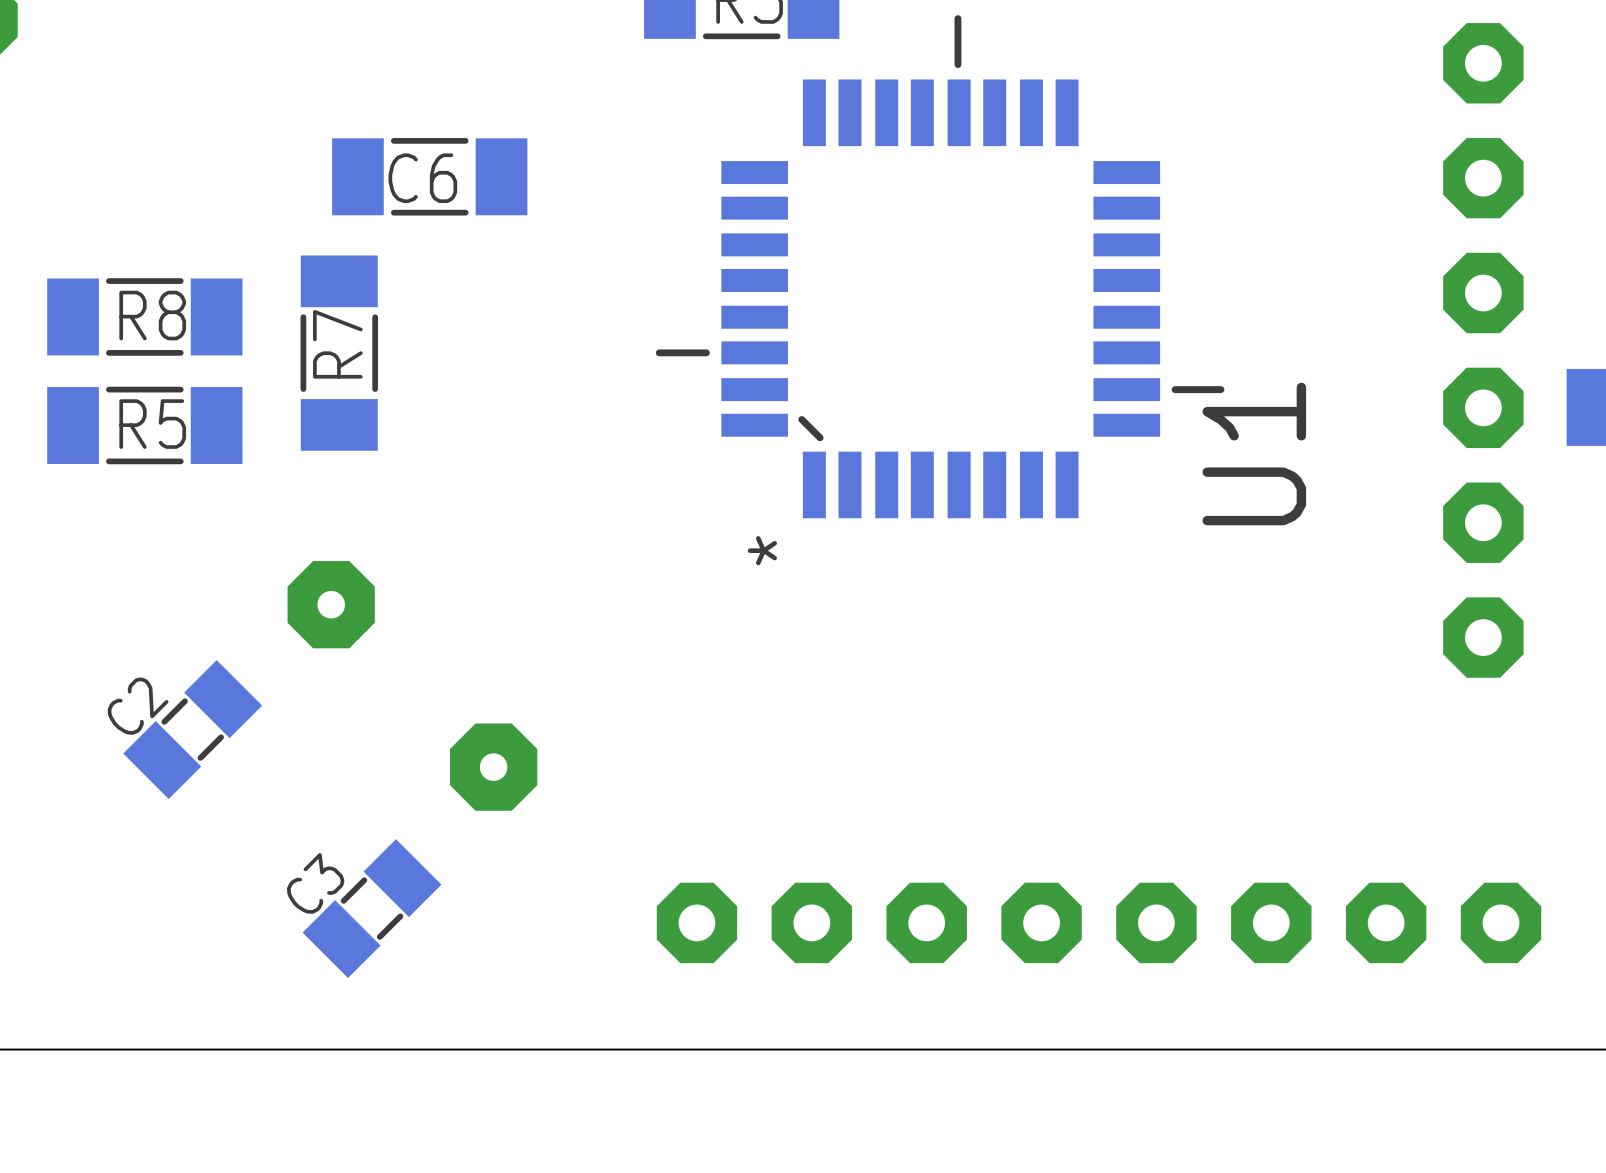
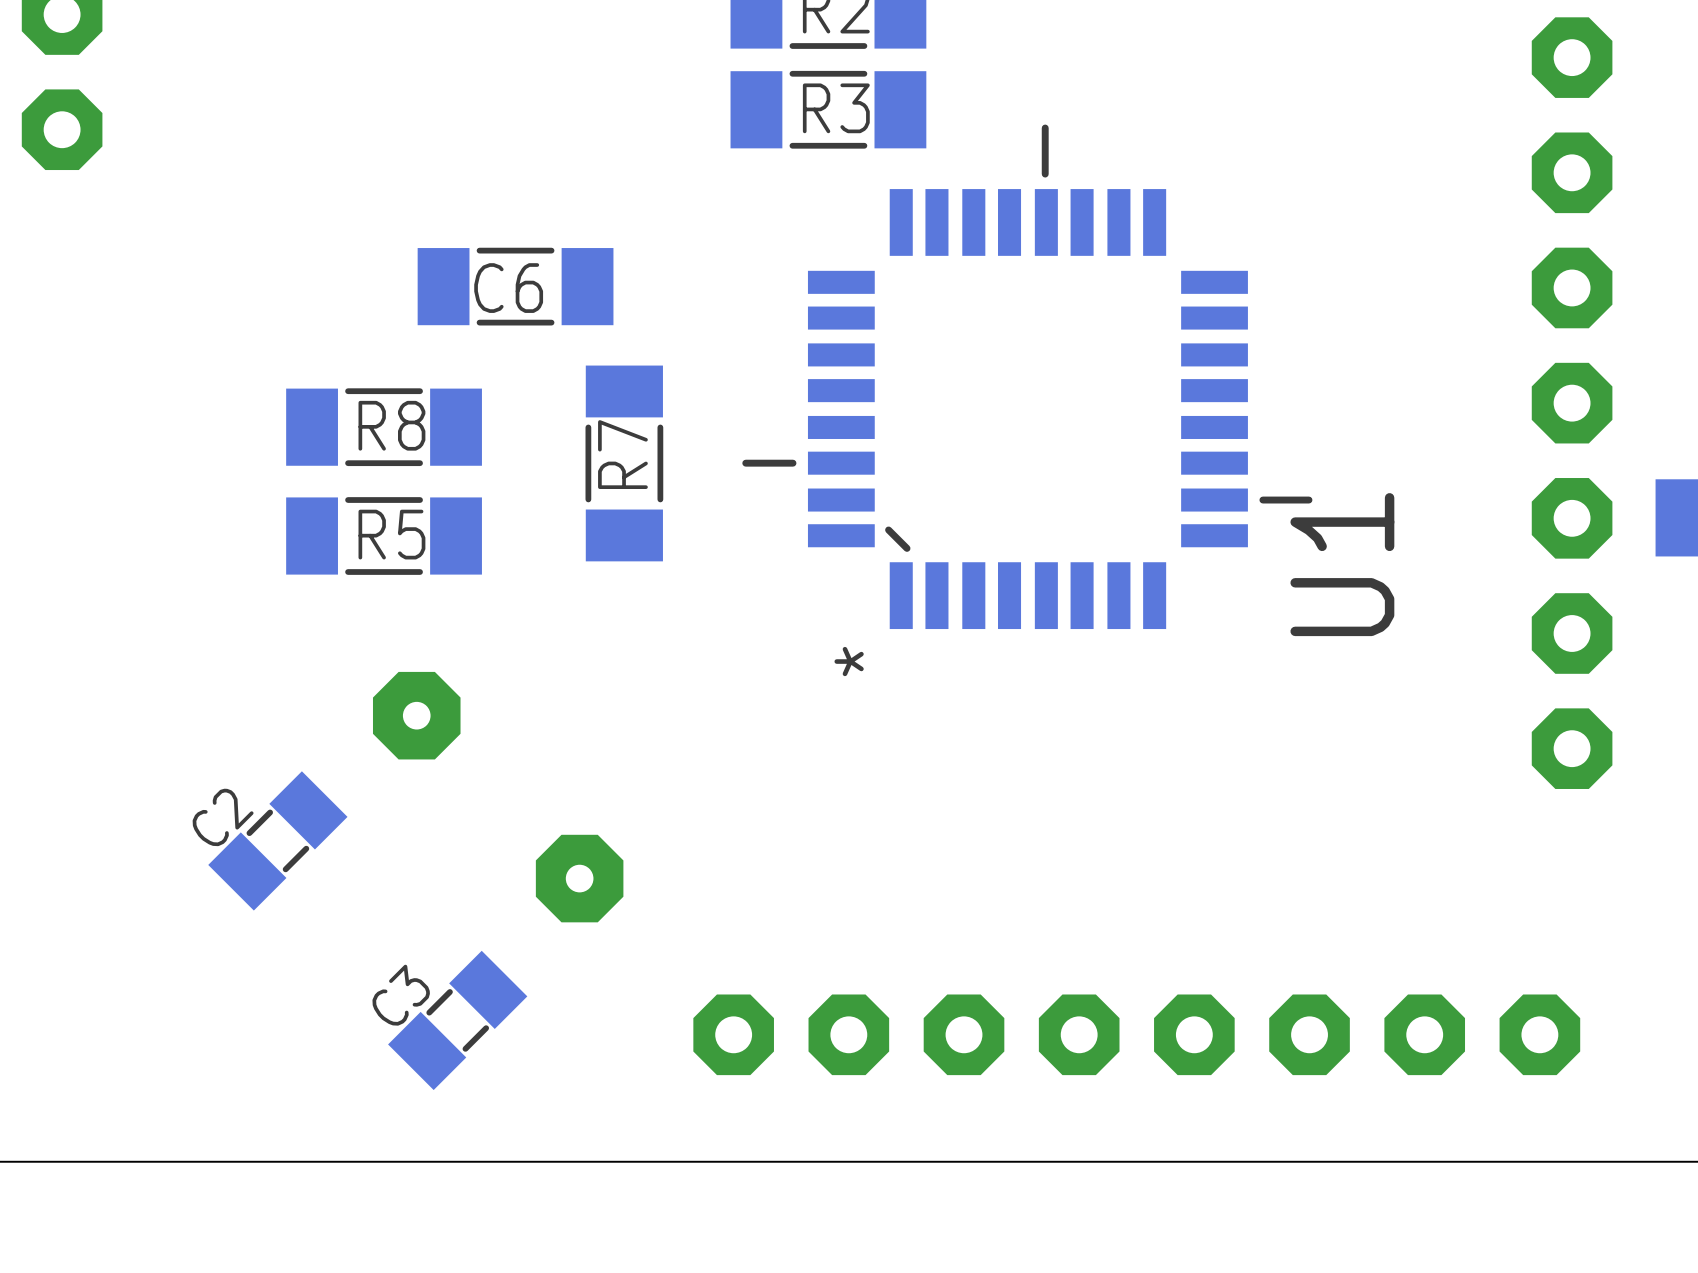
R8 position: (144, 316) -> (384, 427)
R7 position: (339, 353) -> (624, 463)
R5 position: (144, 425) -> (384, 536)
part position: (1099, 922) -> (1136, 1034)

